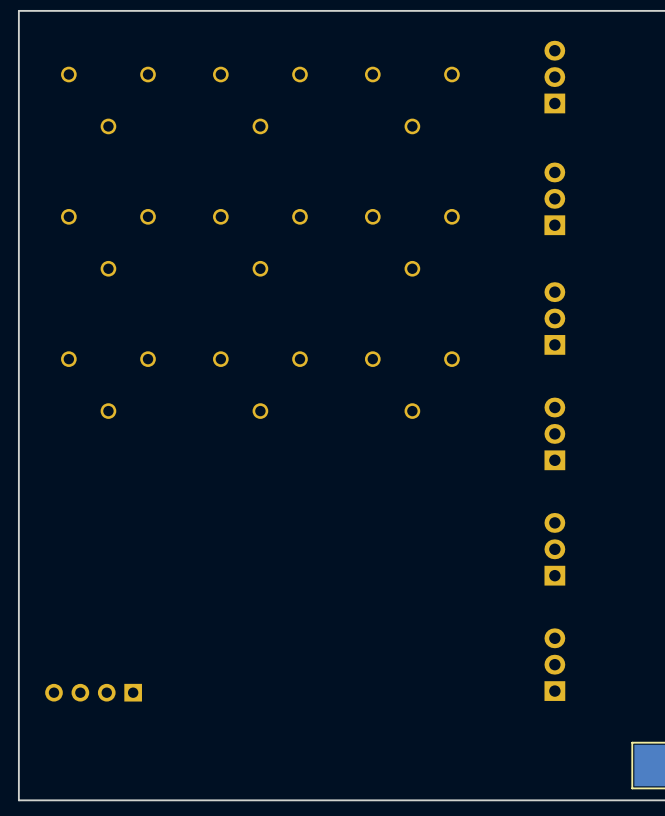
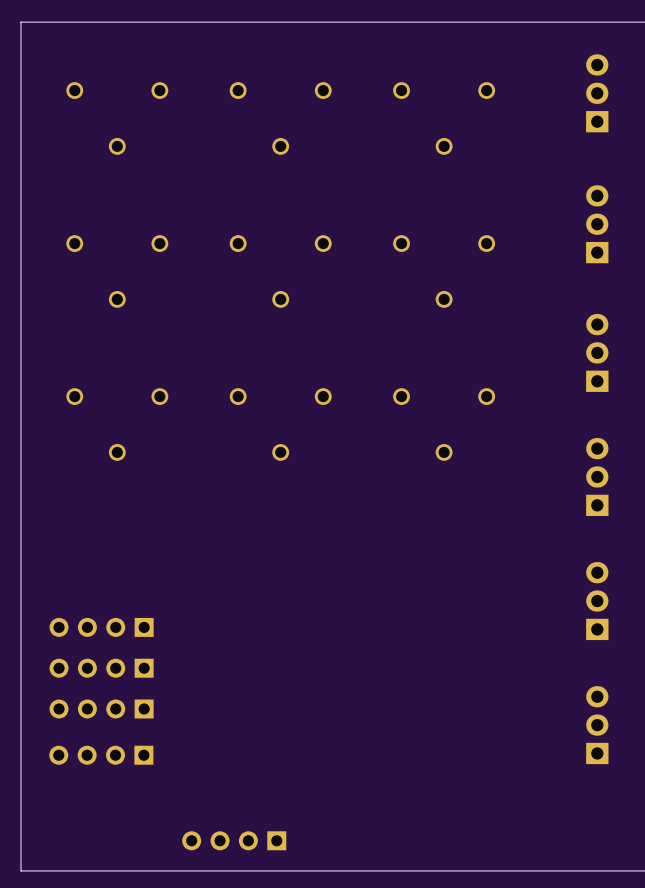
part: none -> (101, 627)
part: none -> (101, 668)
part: none -> (101, 708)
part: none -> (234, 840)

